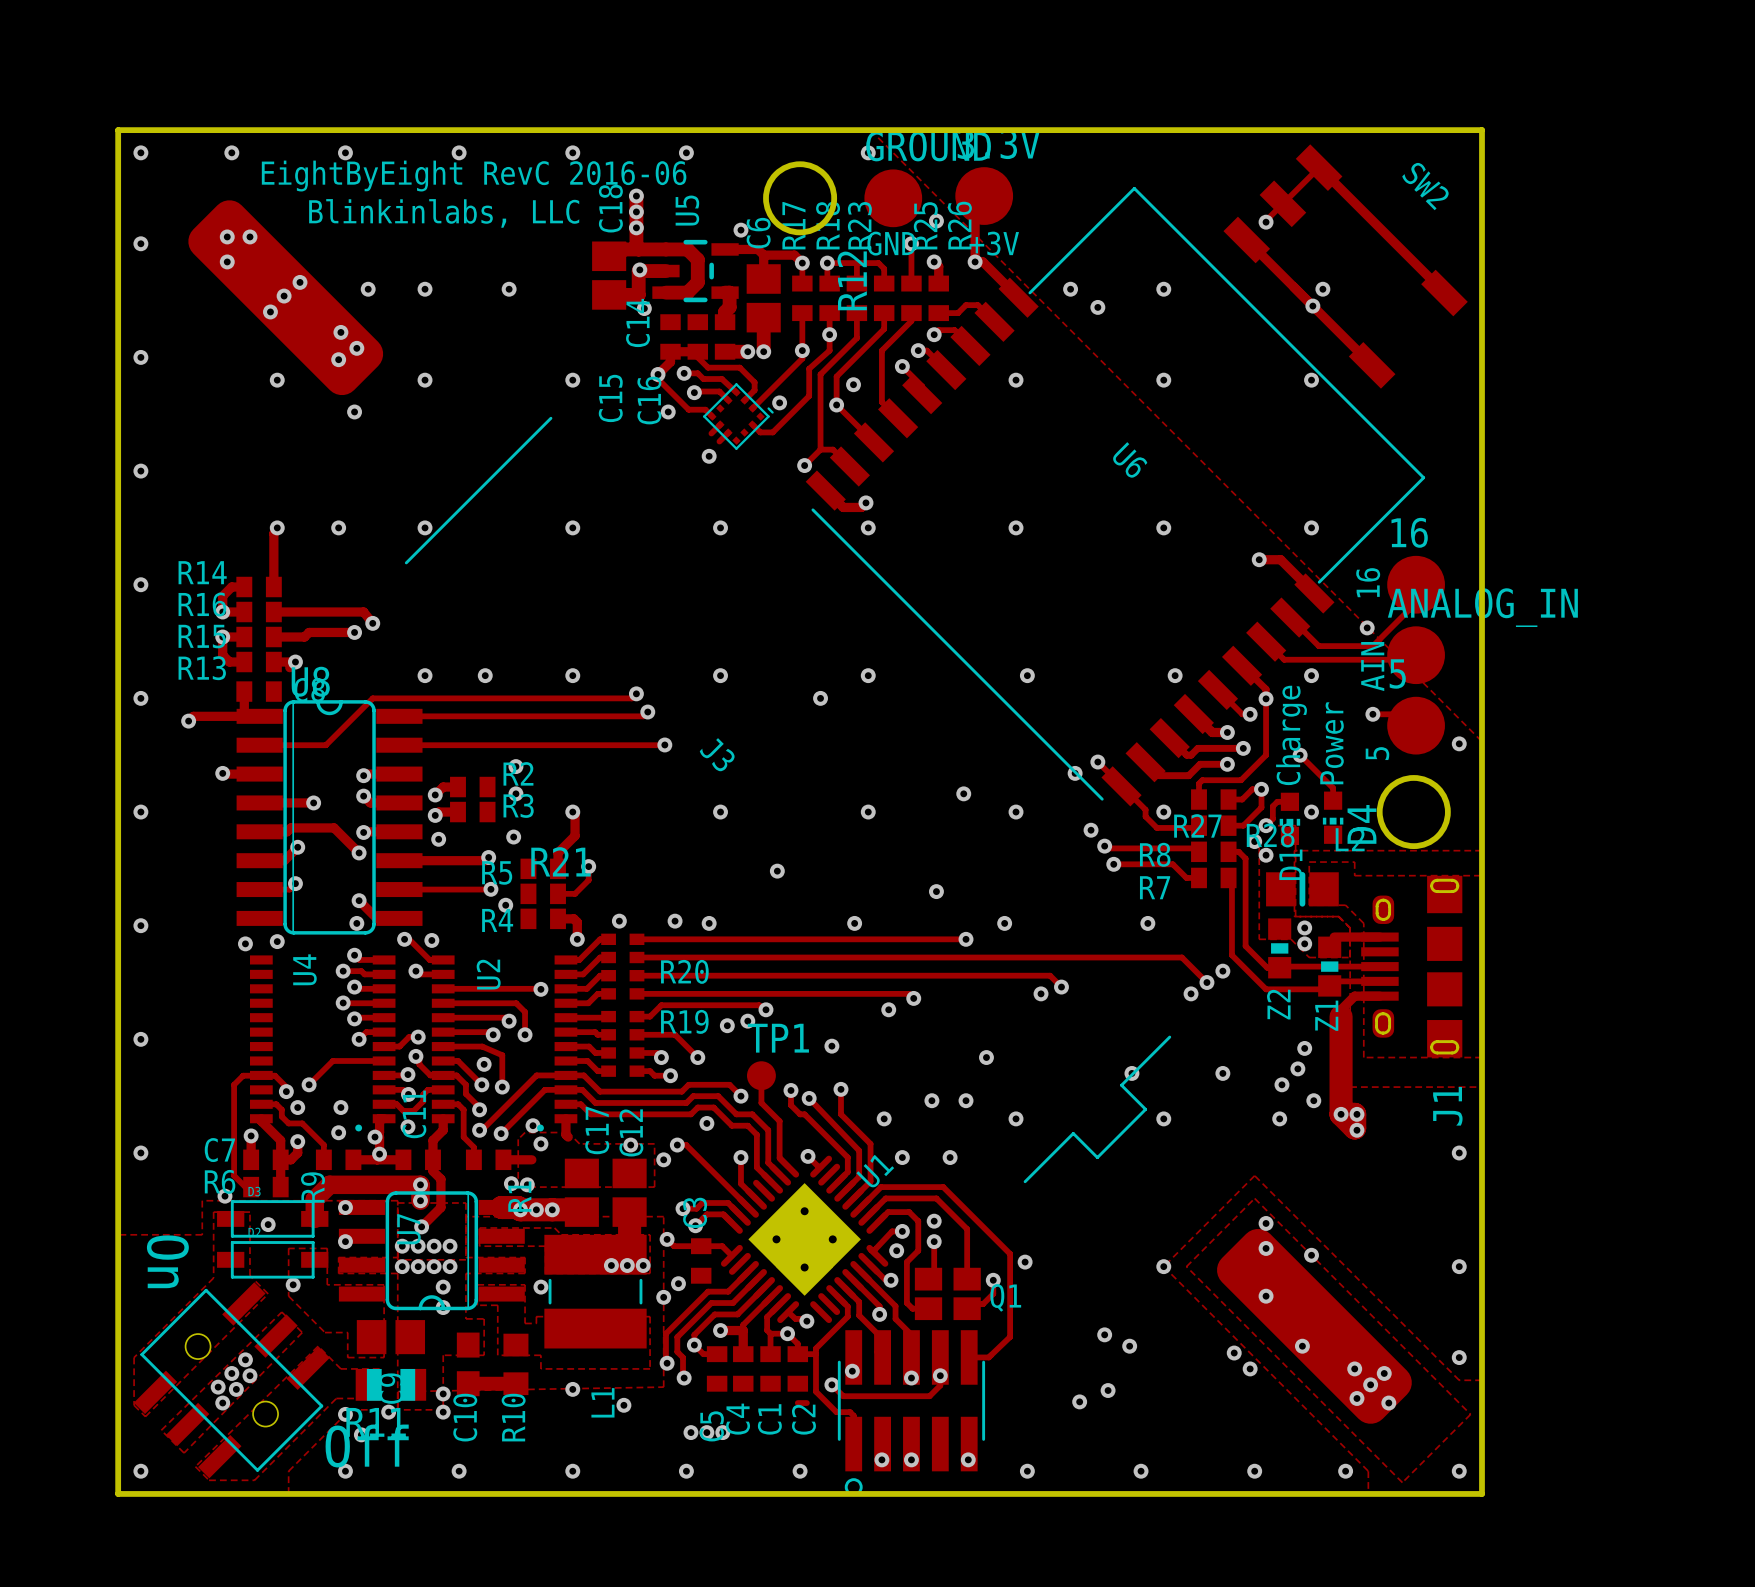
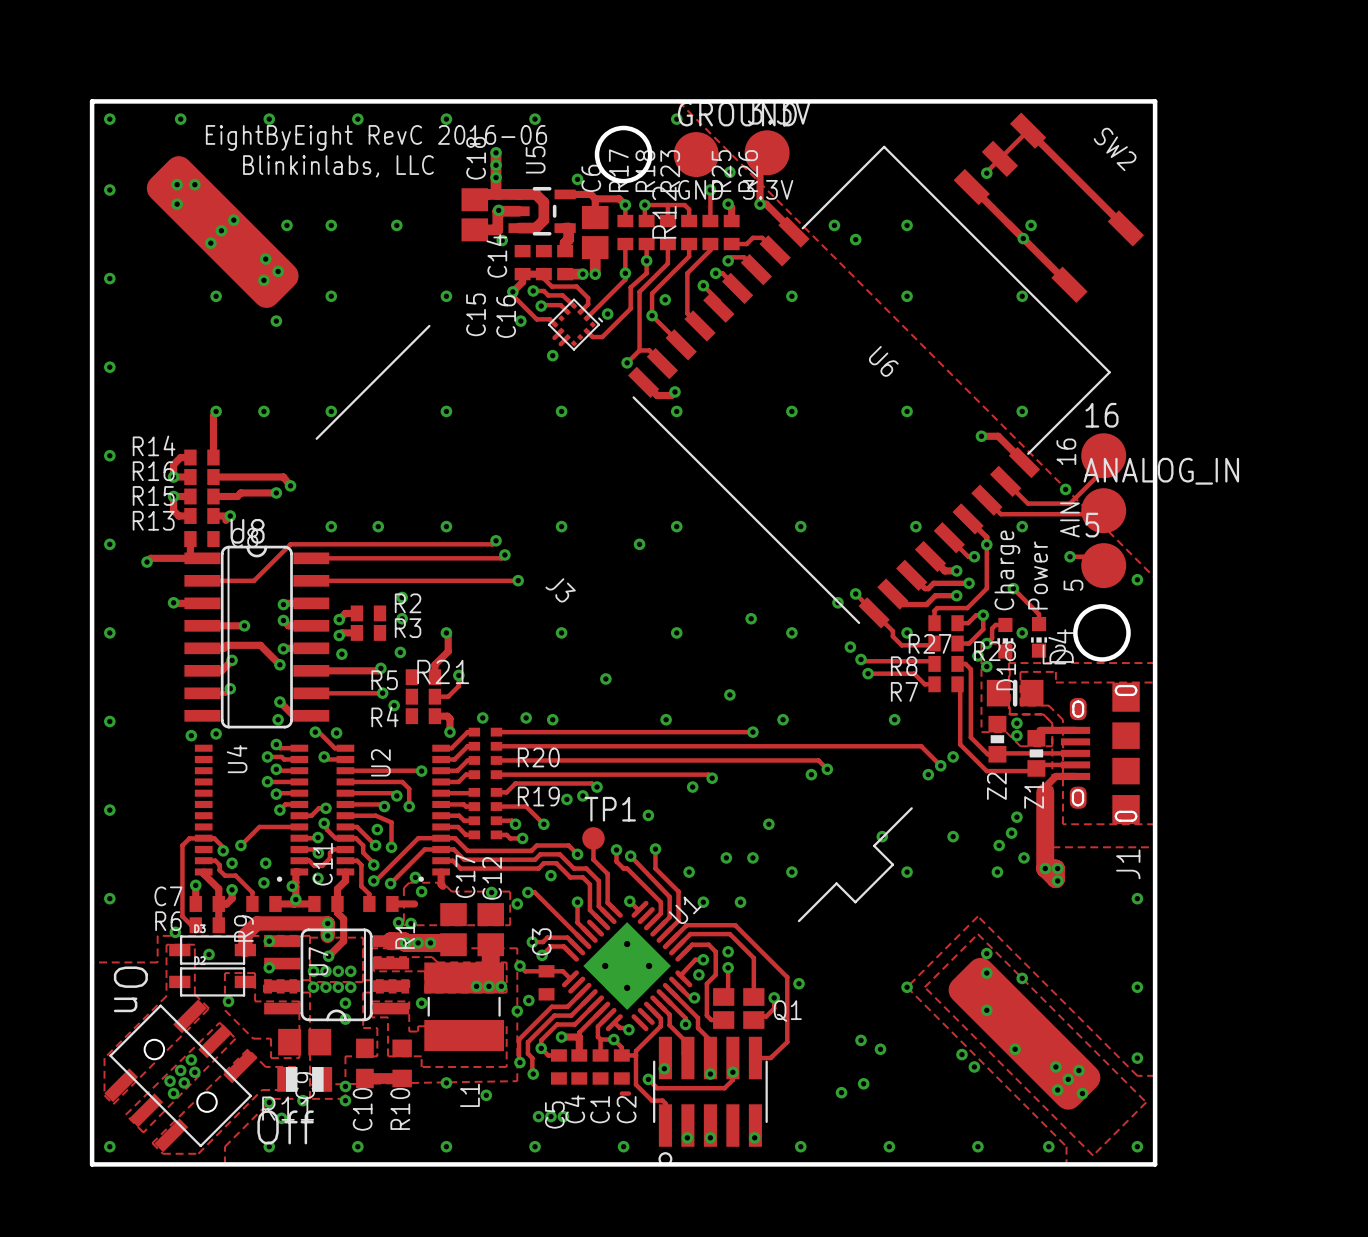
text: +3V (994, 243) -> 3.3V (768, 189)

